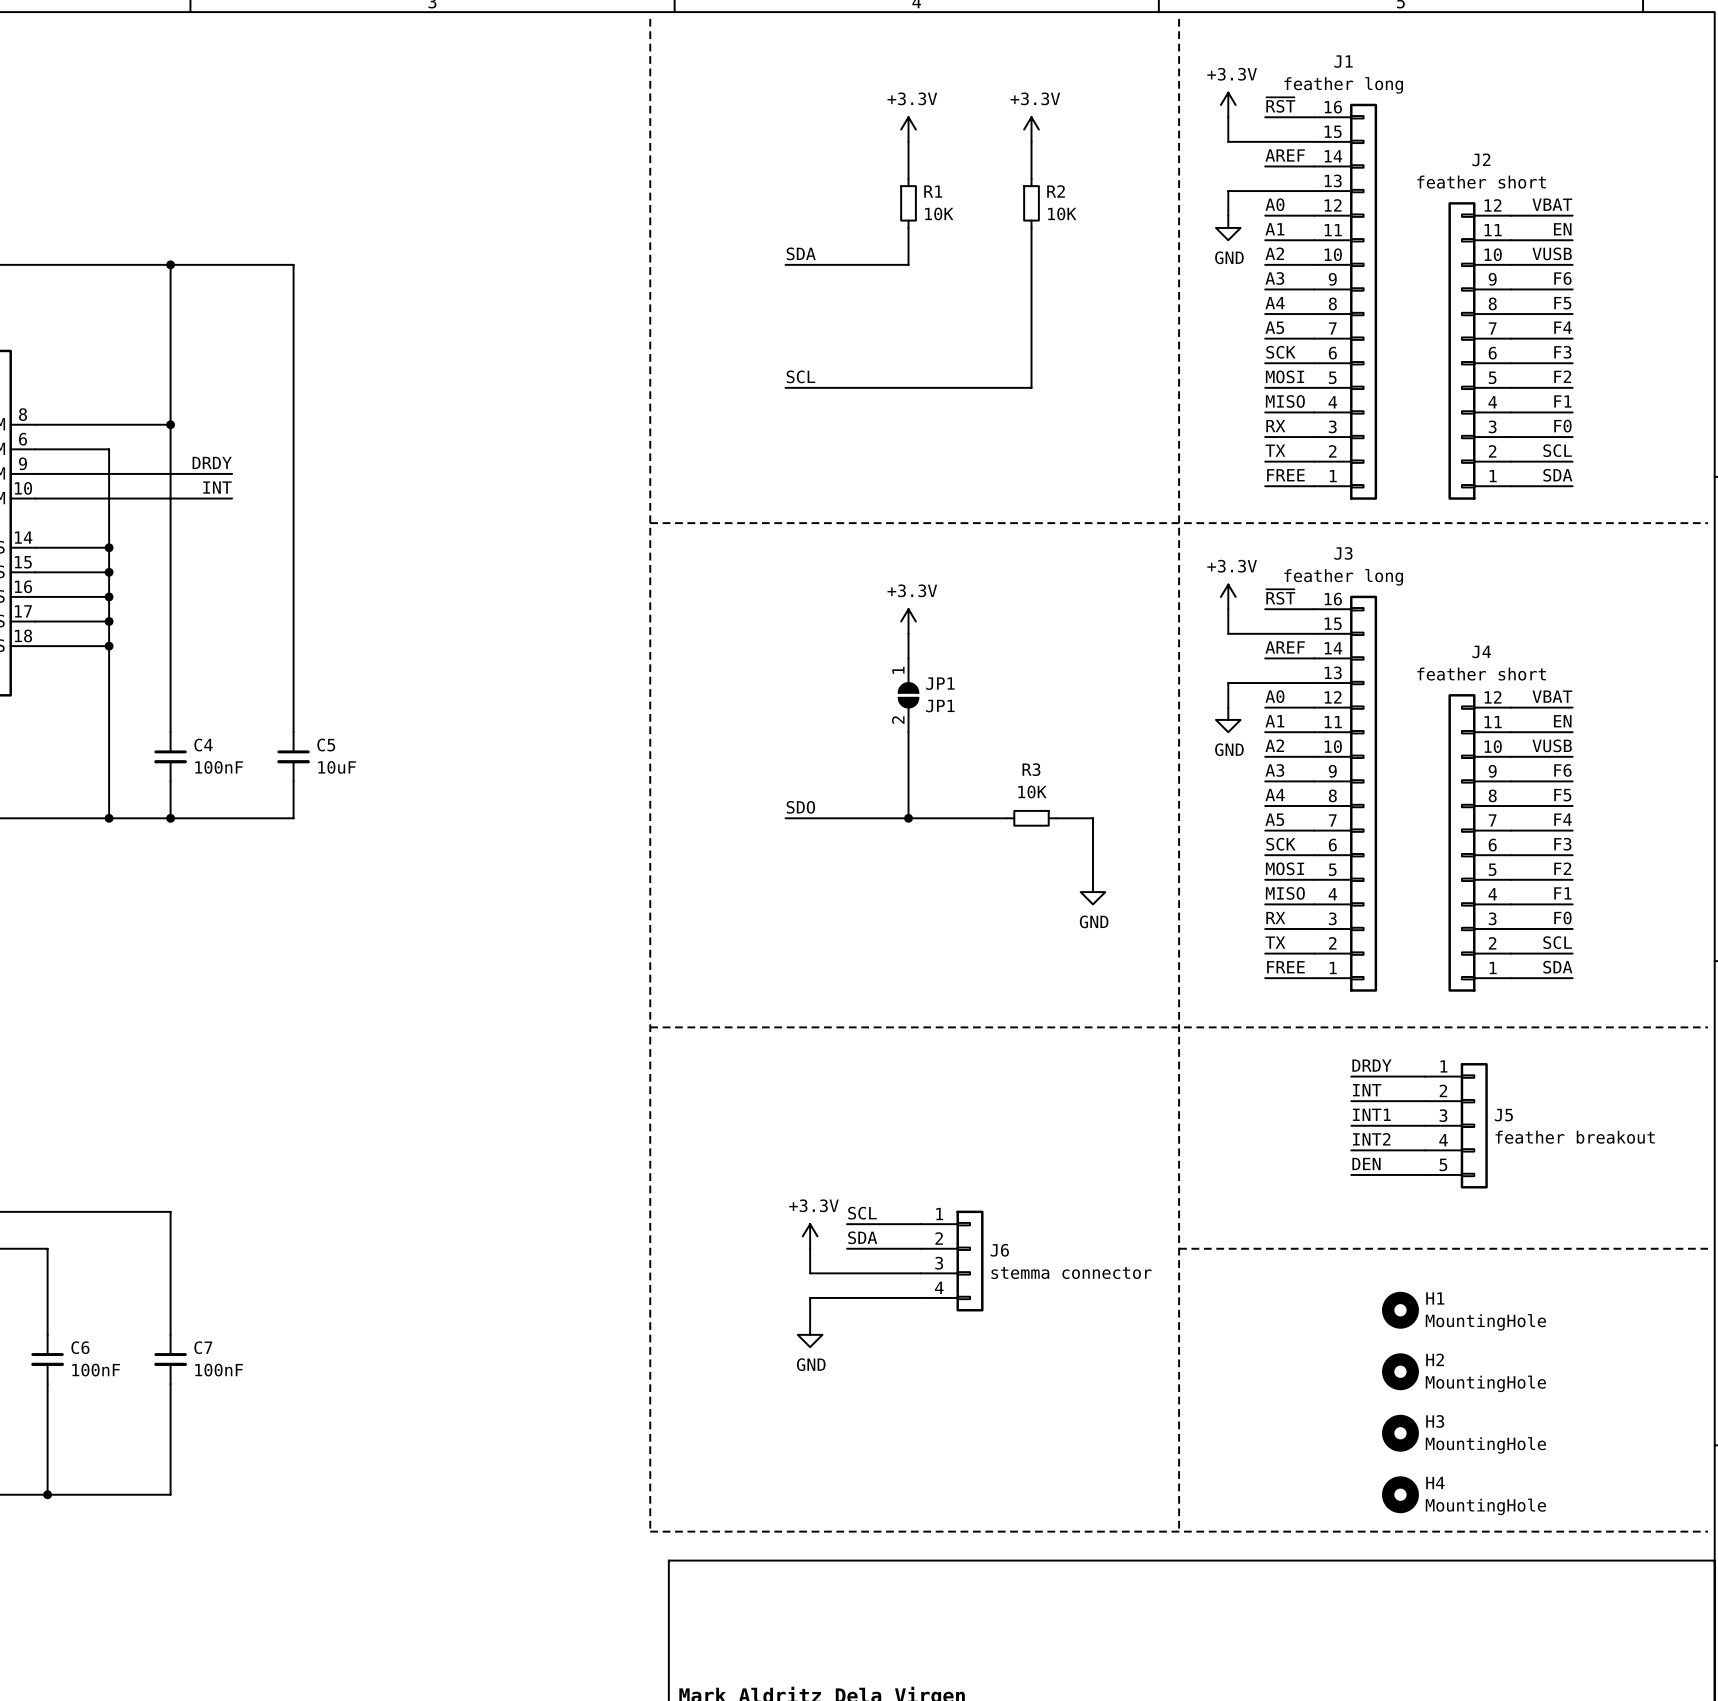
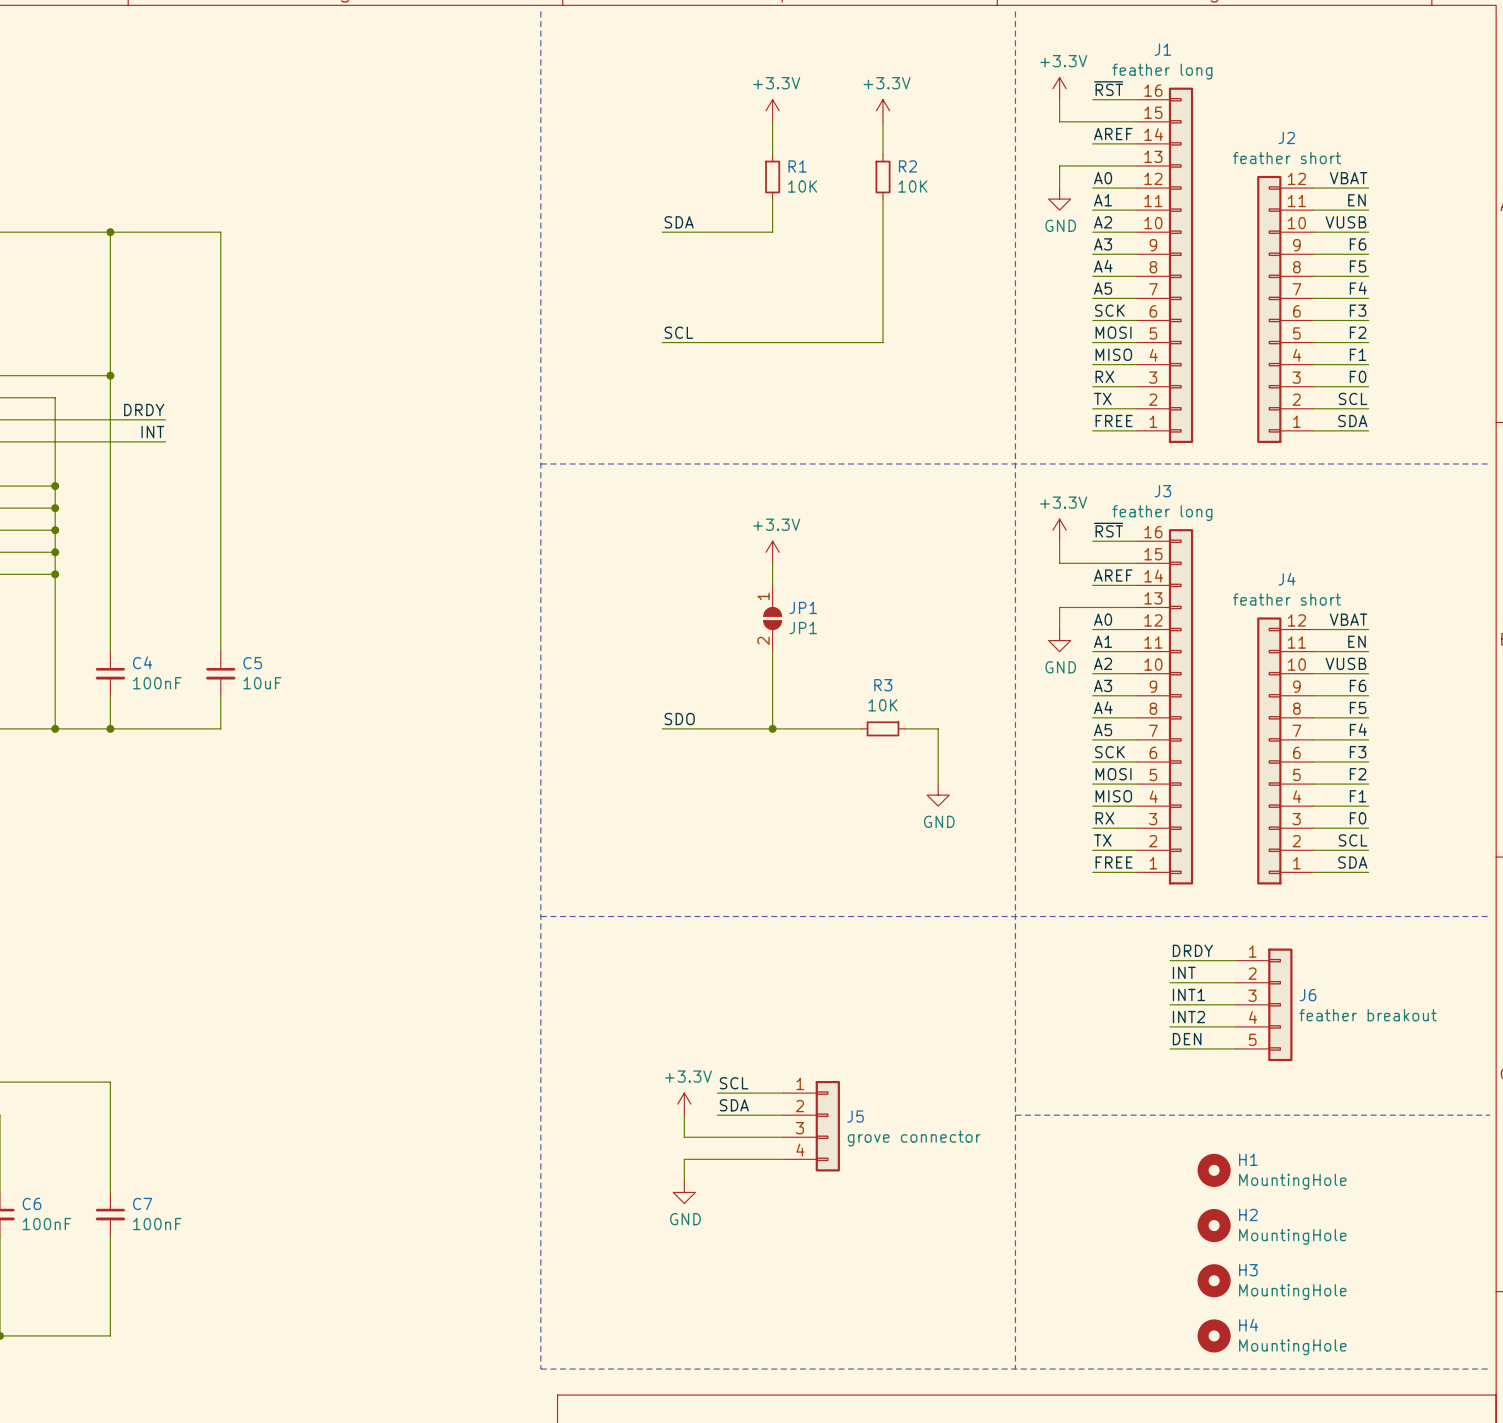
J5 name: J5 (1503, 1115) -> J6 (1308, 995)
J6 name: J6 (999, 1250) -> J5 (855, 1116)
J6 value: stemma connector (1071, 1273) -> grove connector (914, 1138)

